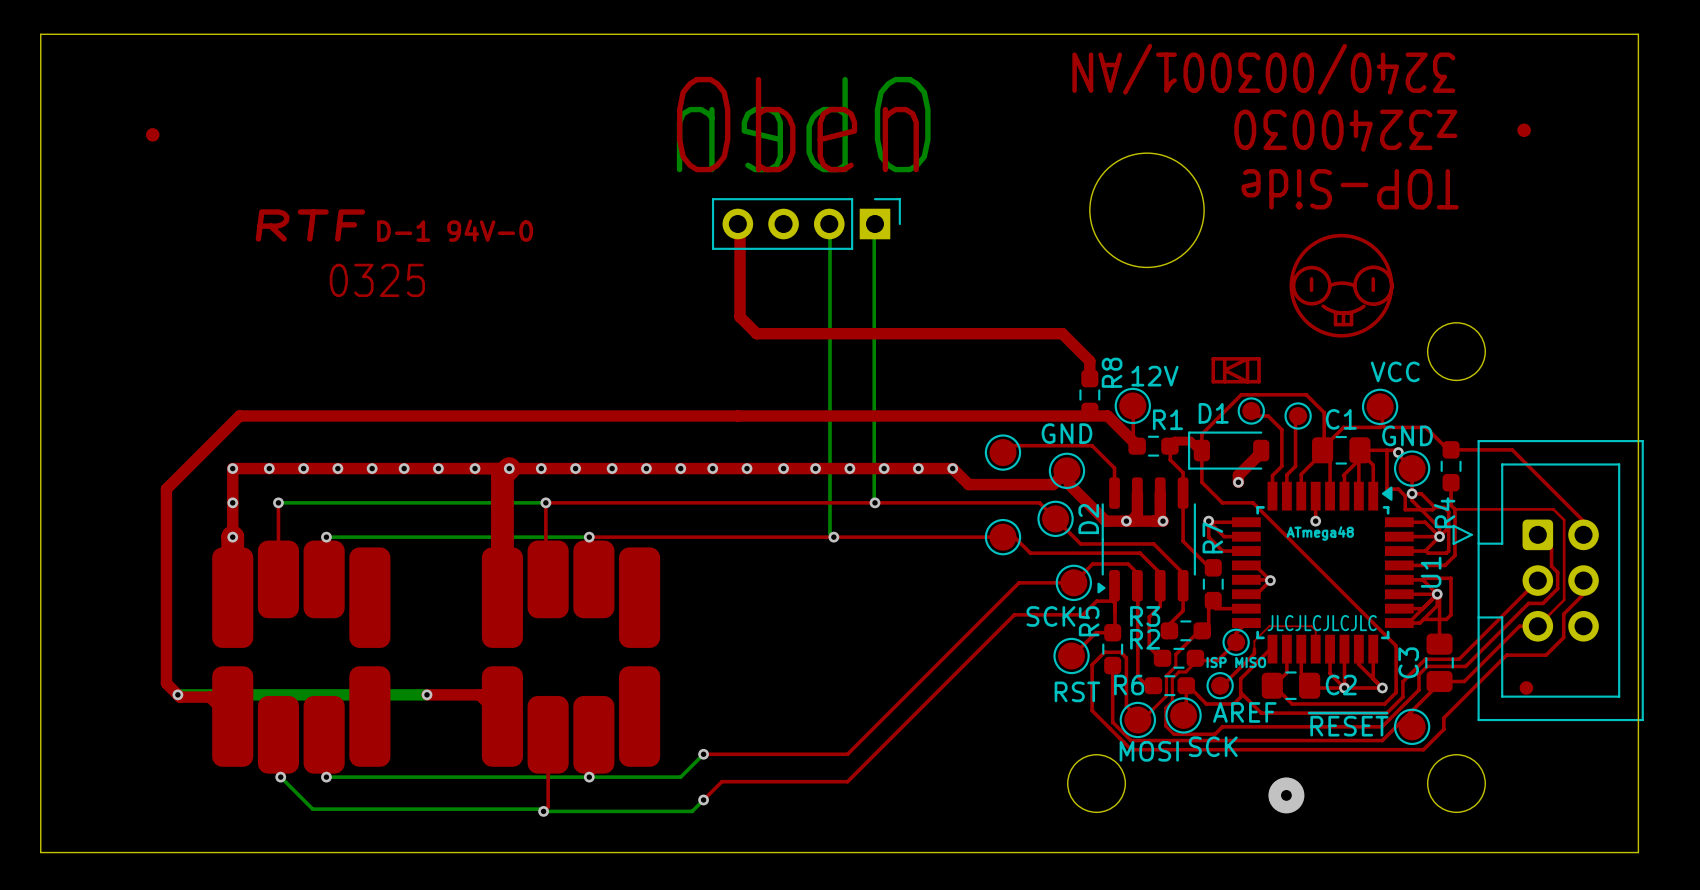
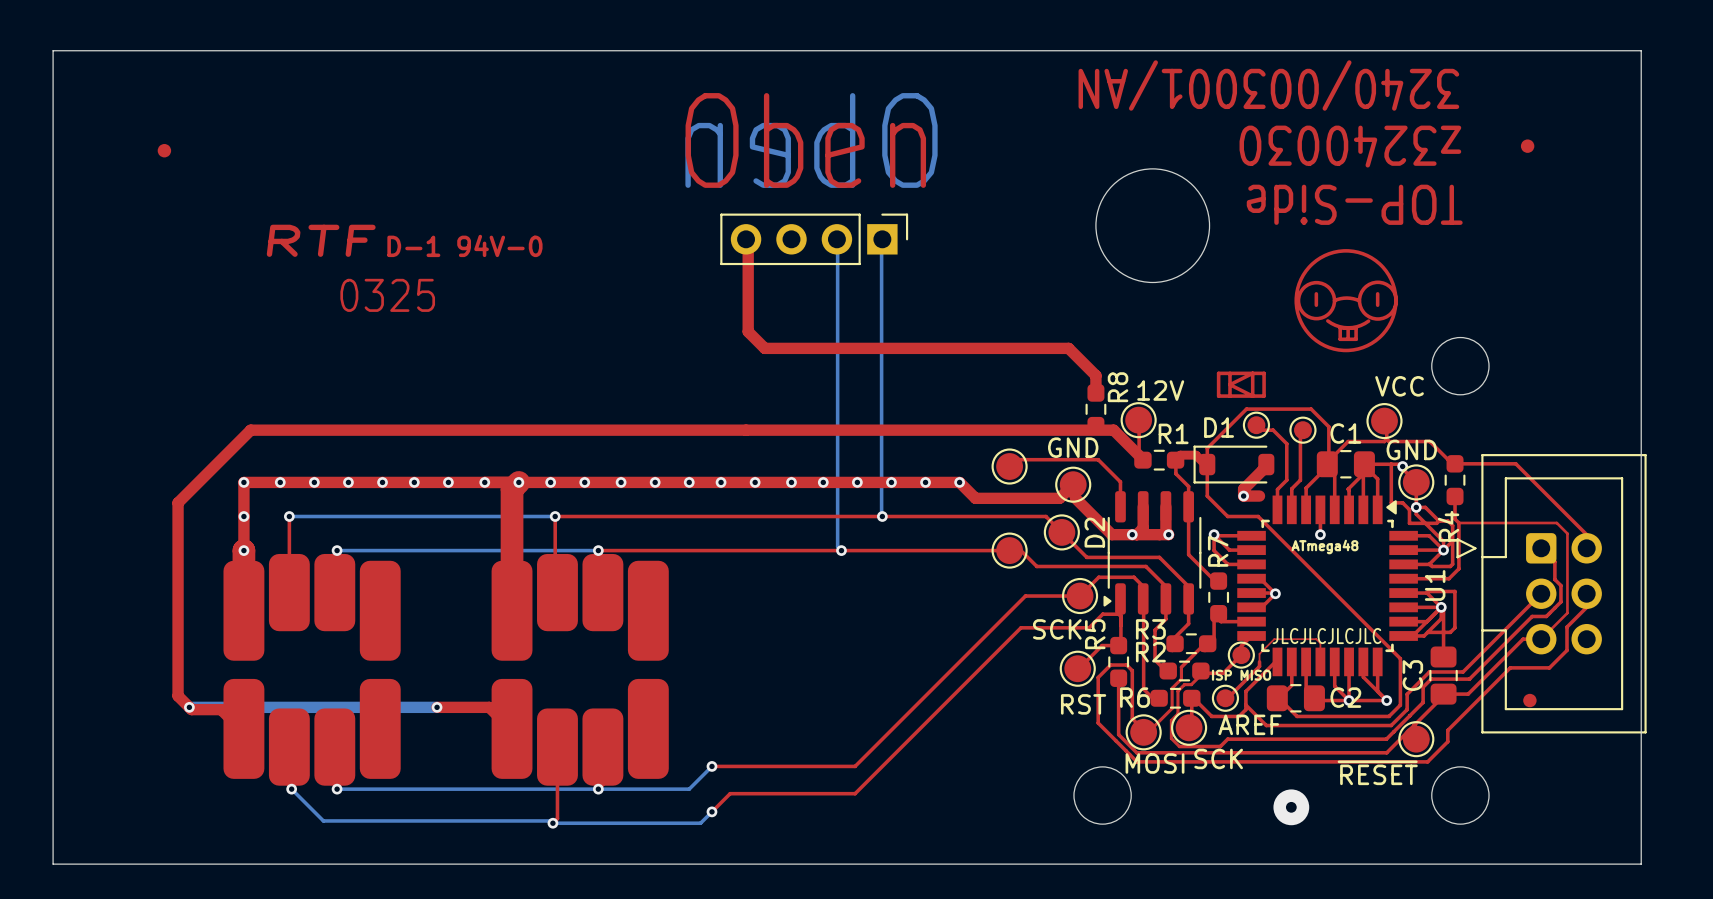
top track: none -> (1243, 496) (1259, 496)
part value position: ~{RESET} (1348, 724) -> ~{RESET} (1377, 772)

